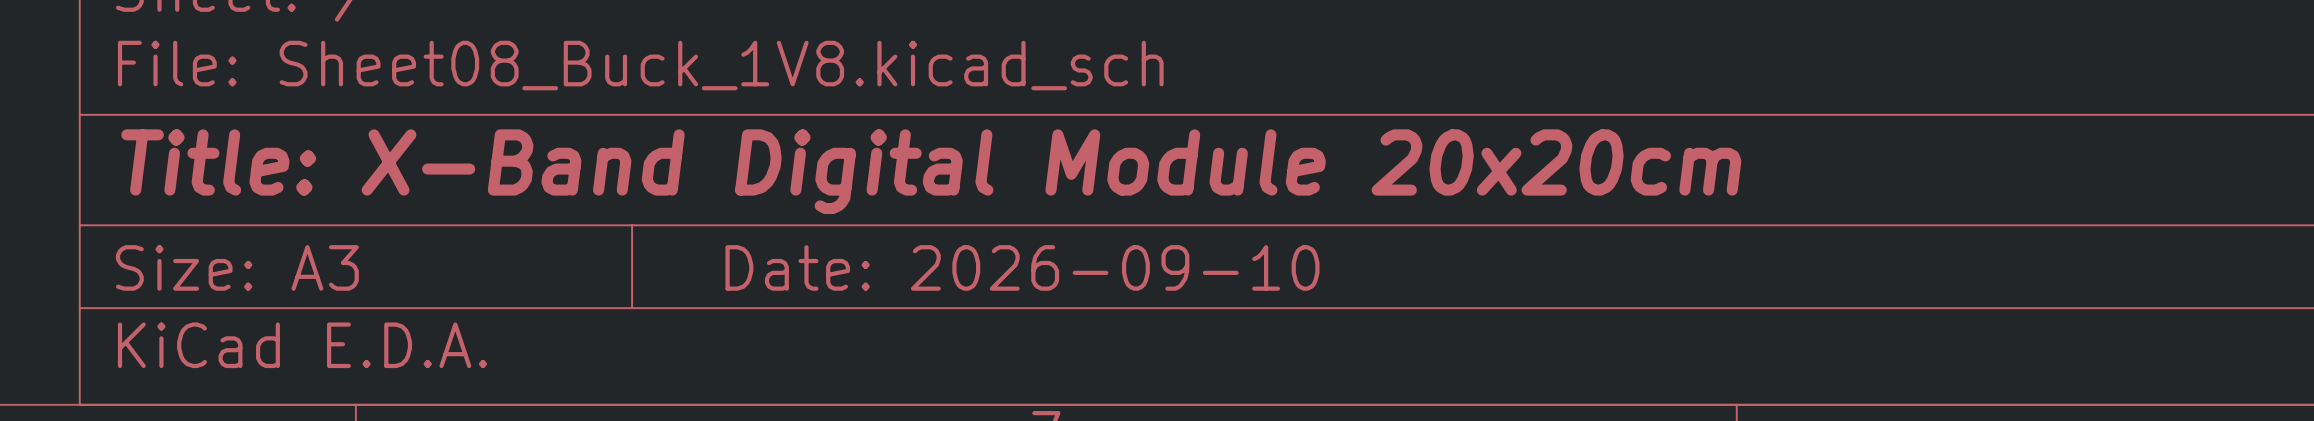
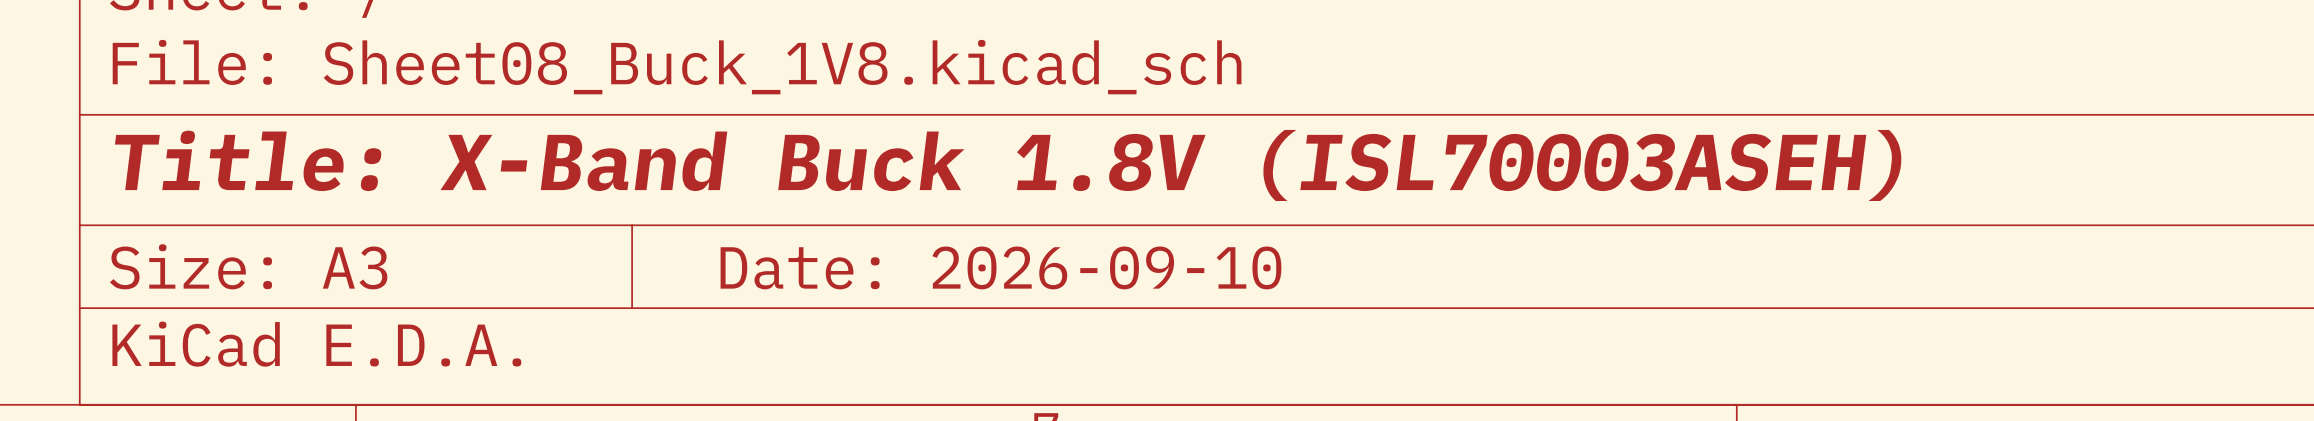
title block: Title: X-Band Digital Module 20x20cm (931, 171) -> Title: X-Band Buck 1.8V (ISL70003ASEH) (1008, 165)

